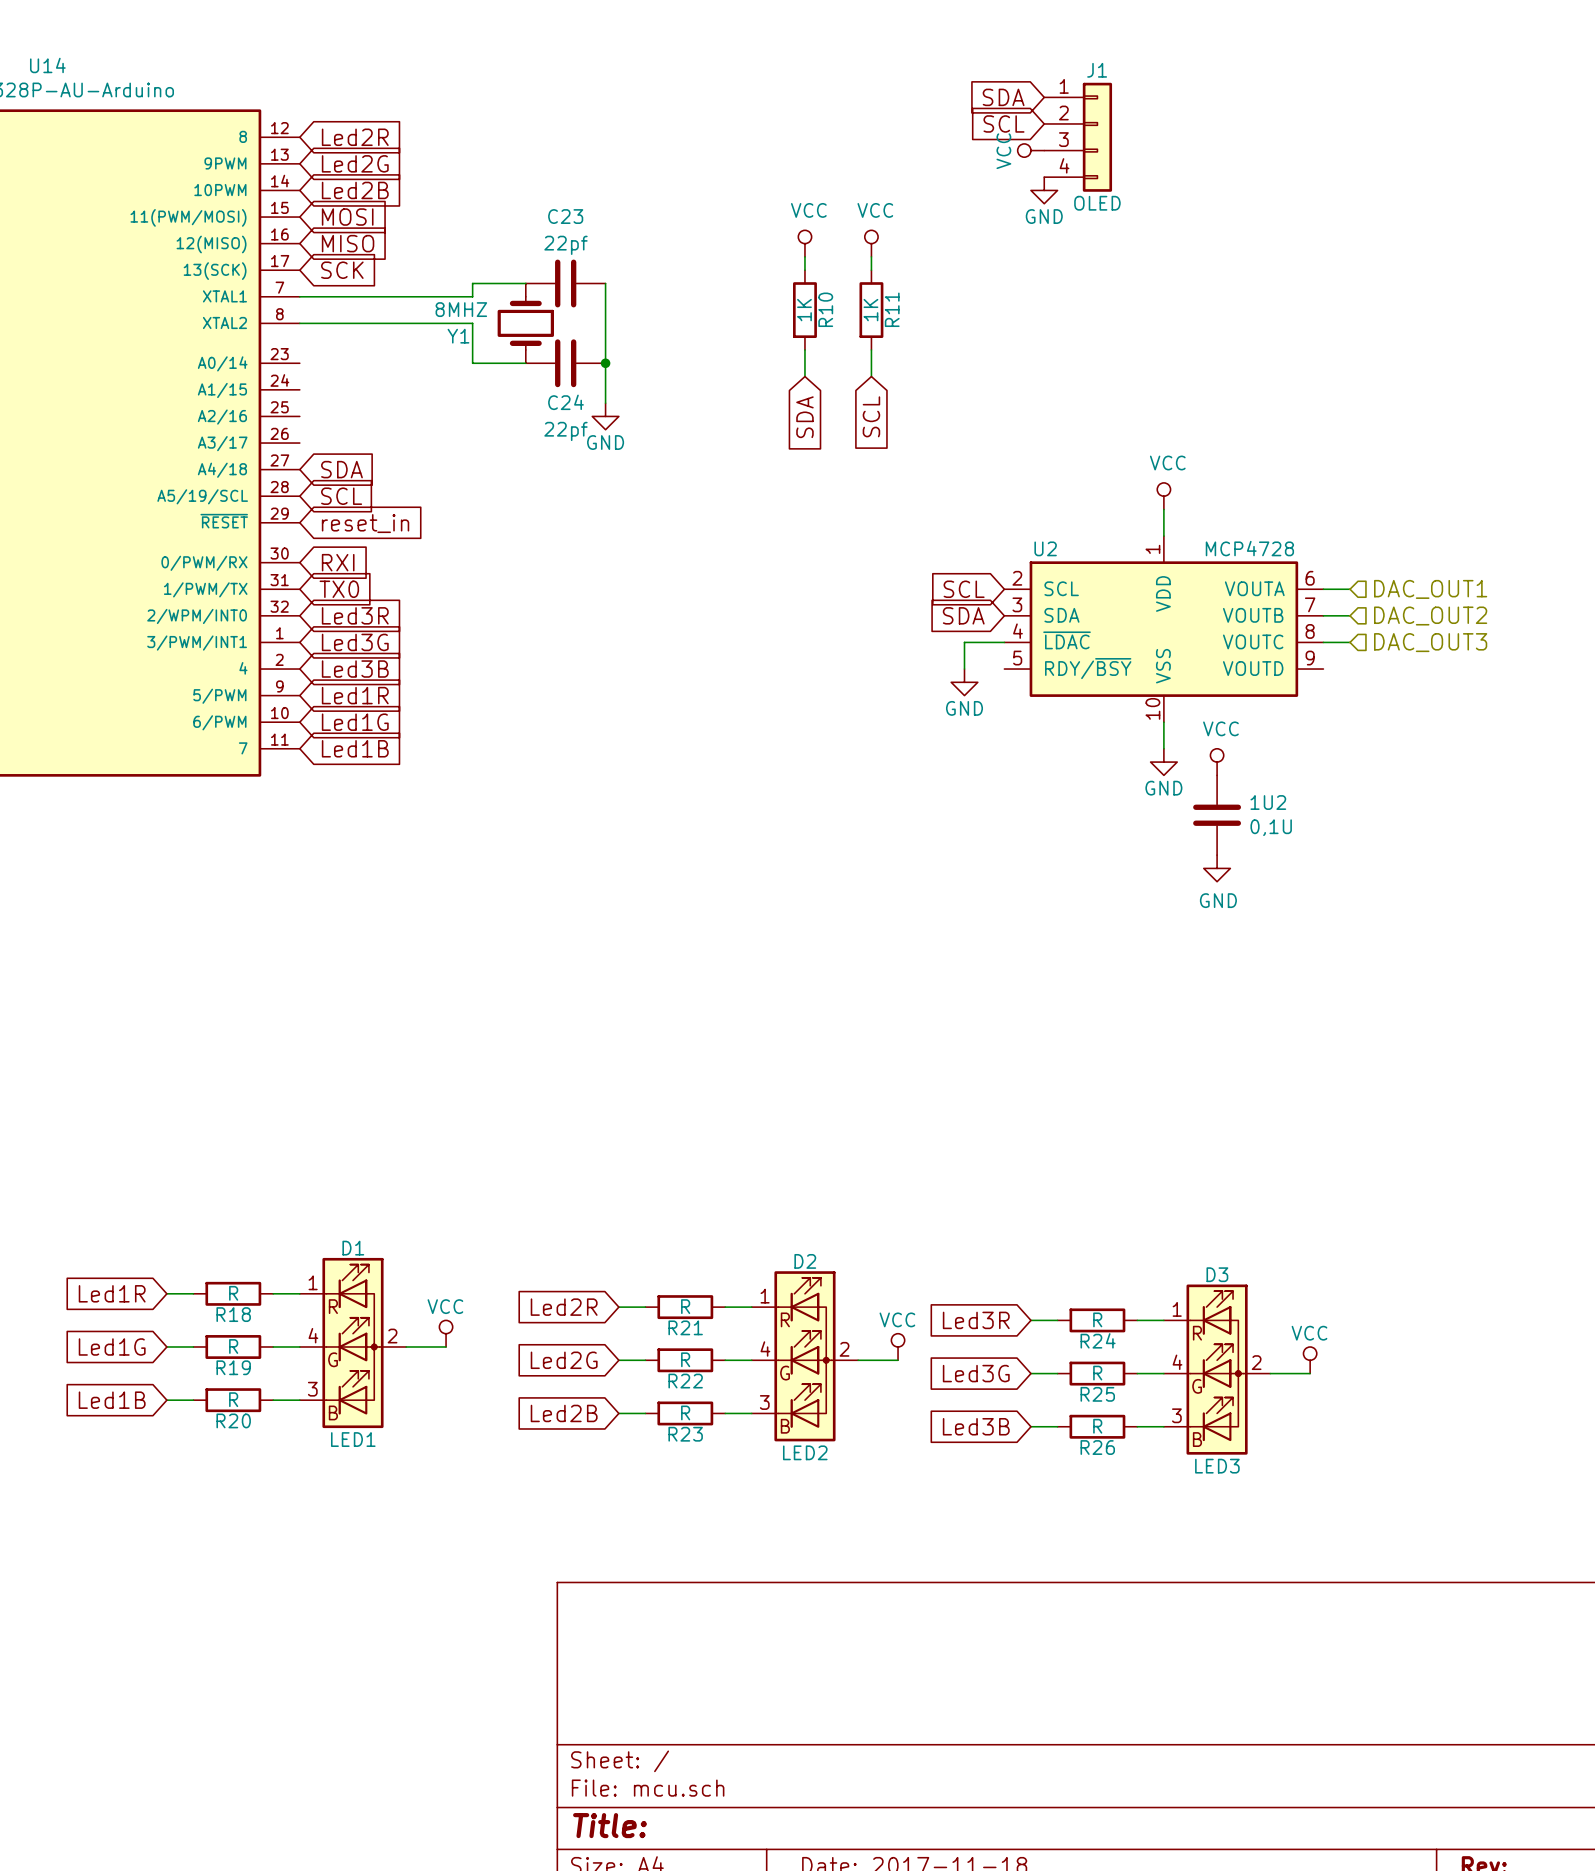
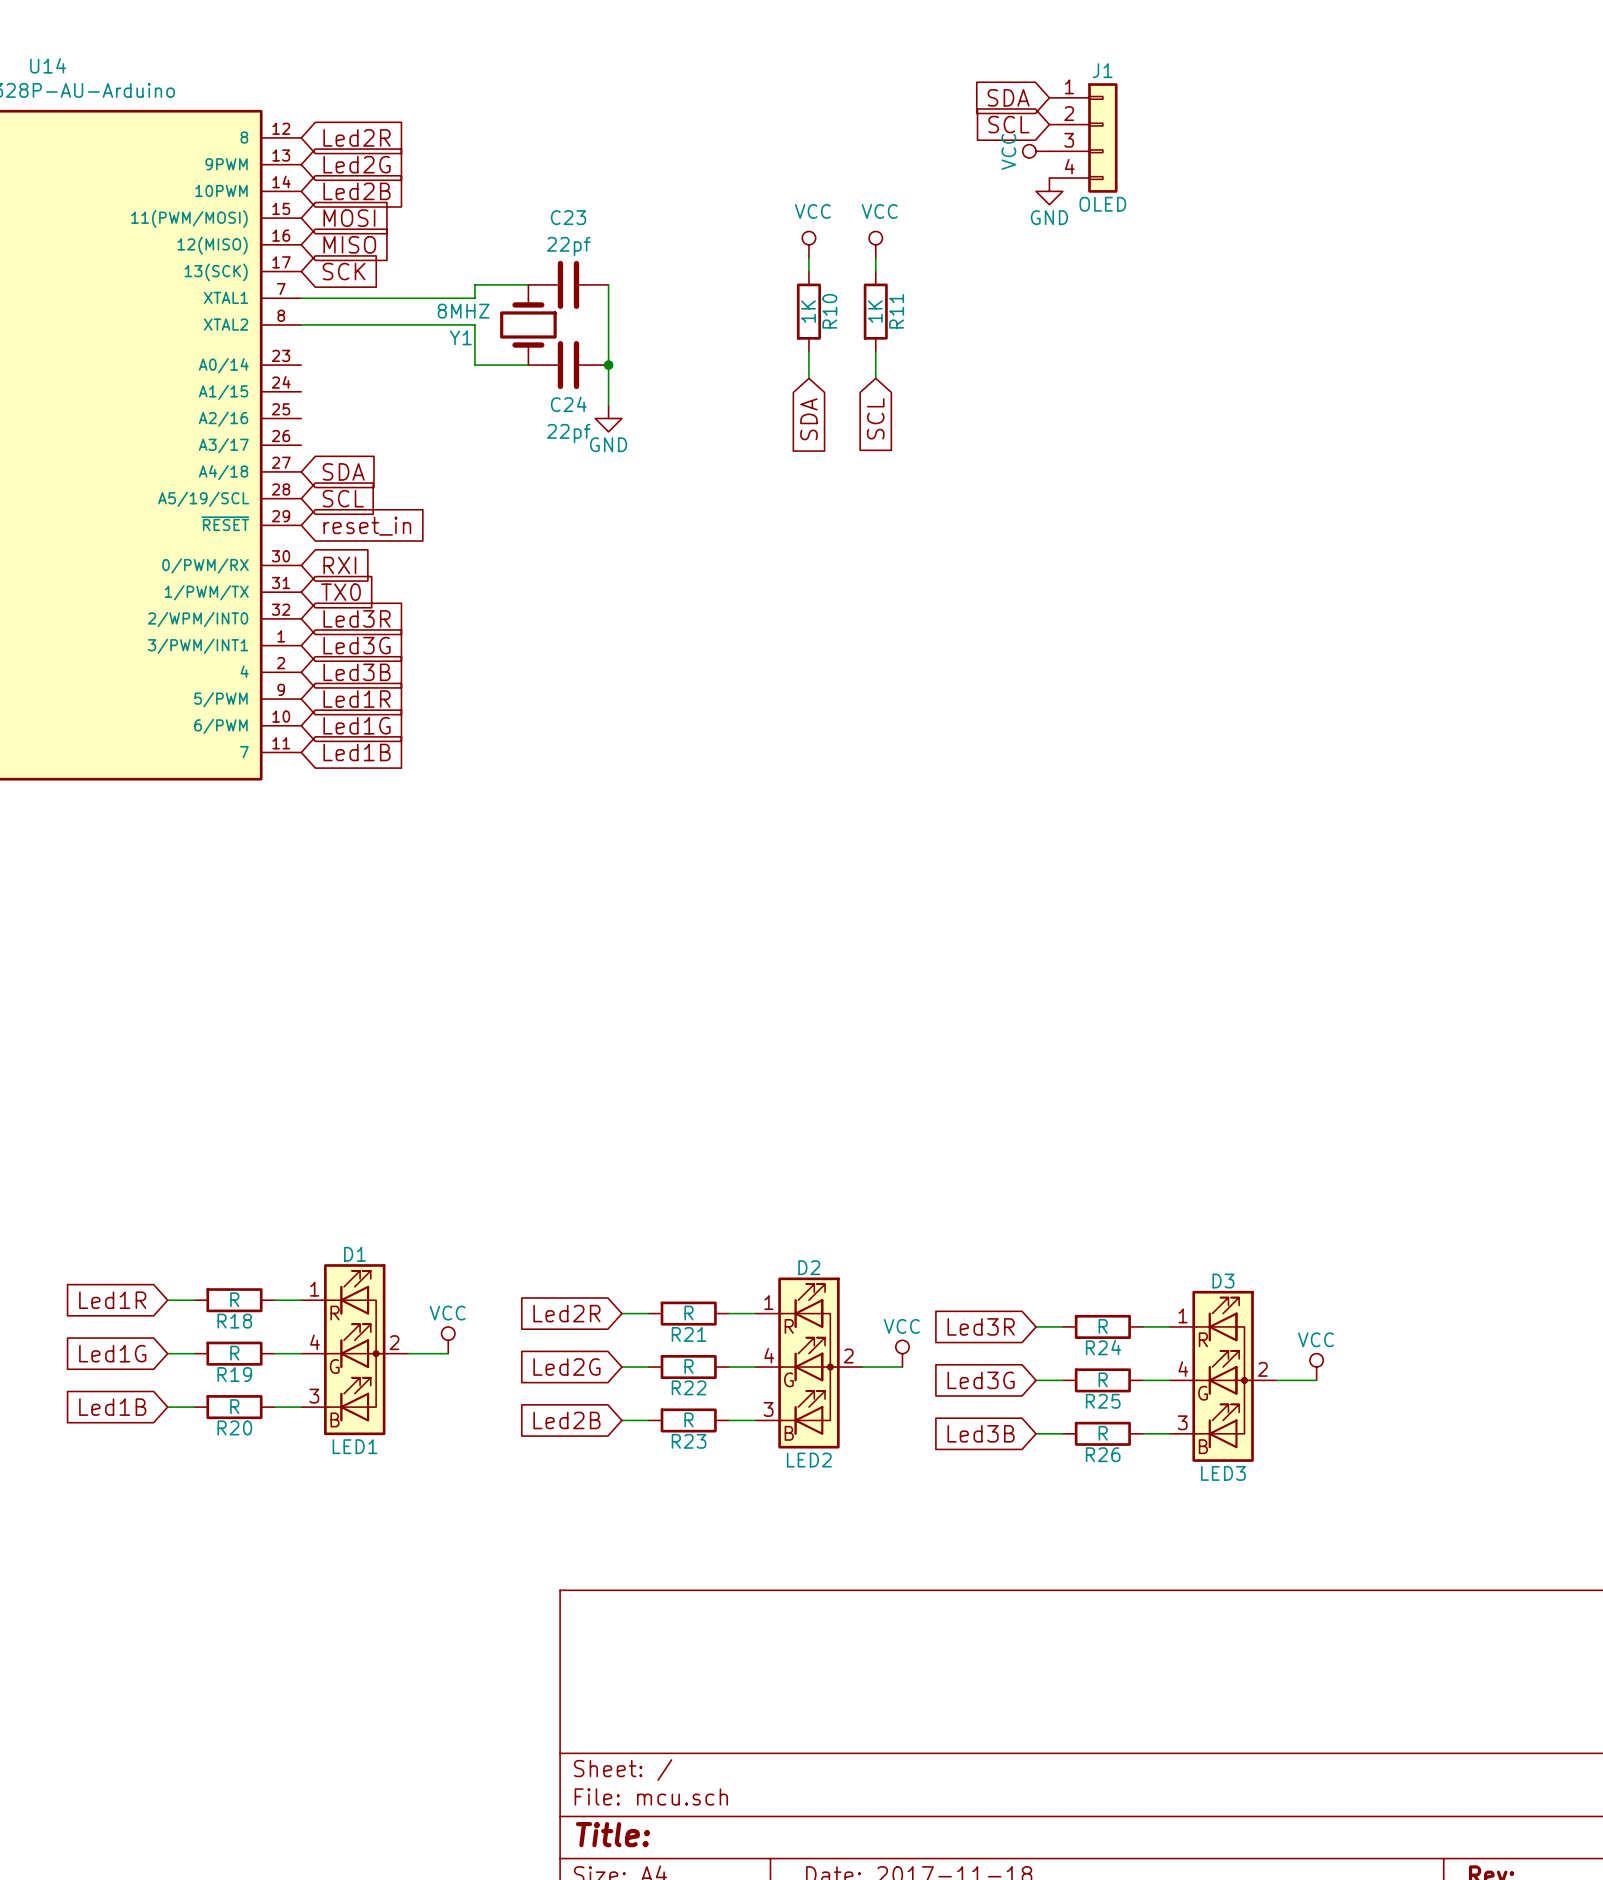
power symbol: VCC (1163, 496) -> none
wire: (1163, 509) (1163, 536) -> none
global label: SCL (964, 589) -> none
wire: (1323, 589) (1350, 589) -> none
hierarchical label: DAC_OUT1 (1430, 589) -> none
global label: SDA (963, 615) -> none
wire: (1323, 615) (1350, 615) -> none
hierarchical label: DAC_OUT2 (1430, 616) -> none
U2: MCP4728 (1163, 629) -> none
wire: (1004, 642) (964, 642) (964, 669) -> none
wire: (1323, 642) (1350, 642) -> none
hierarchical label: DAC_OUT3 (1430, 642) -> none
power symbol: GND (964, 682) -> none
wire: (1163, 722) (1163, 748) -> none
power symbol: GND (1163, 762) -> none
power symbol: VCC (1217, 762) -> none
1U2: 0,1U (1217, 815) -> none
power symbol: GND (1217, 868) -> none

